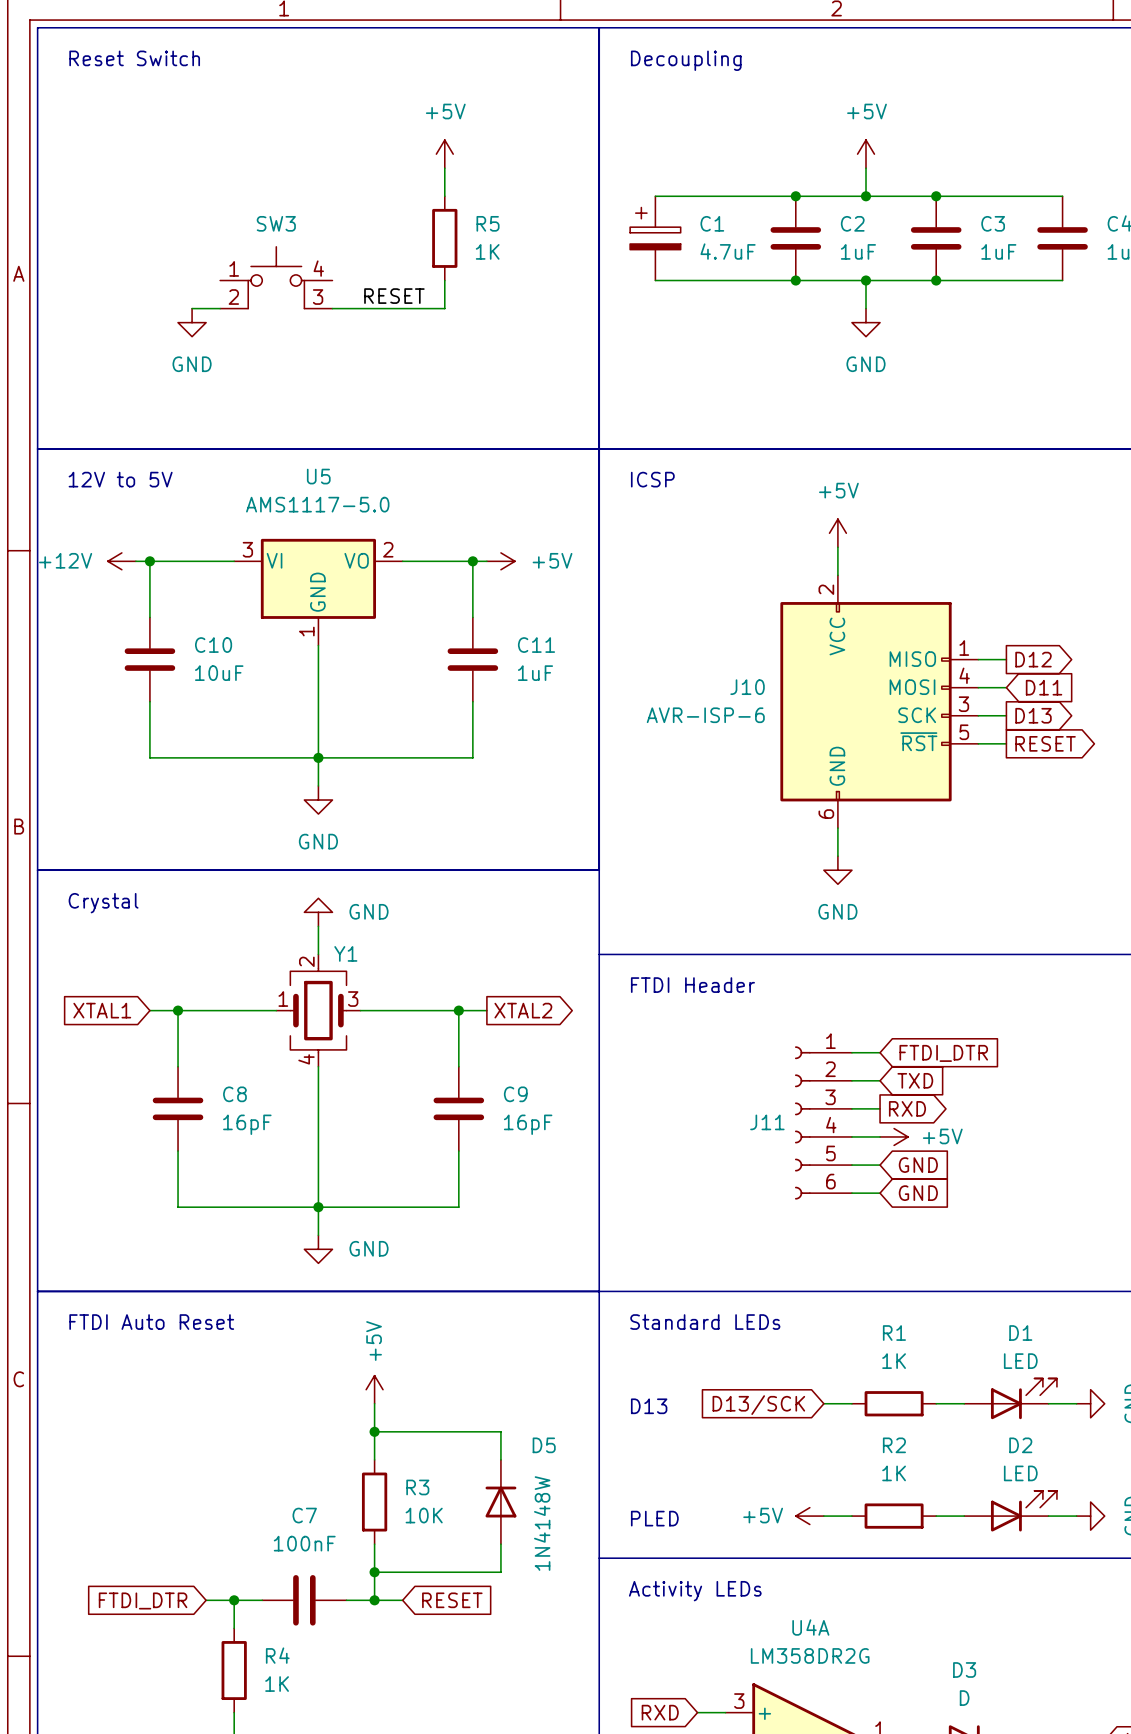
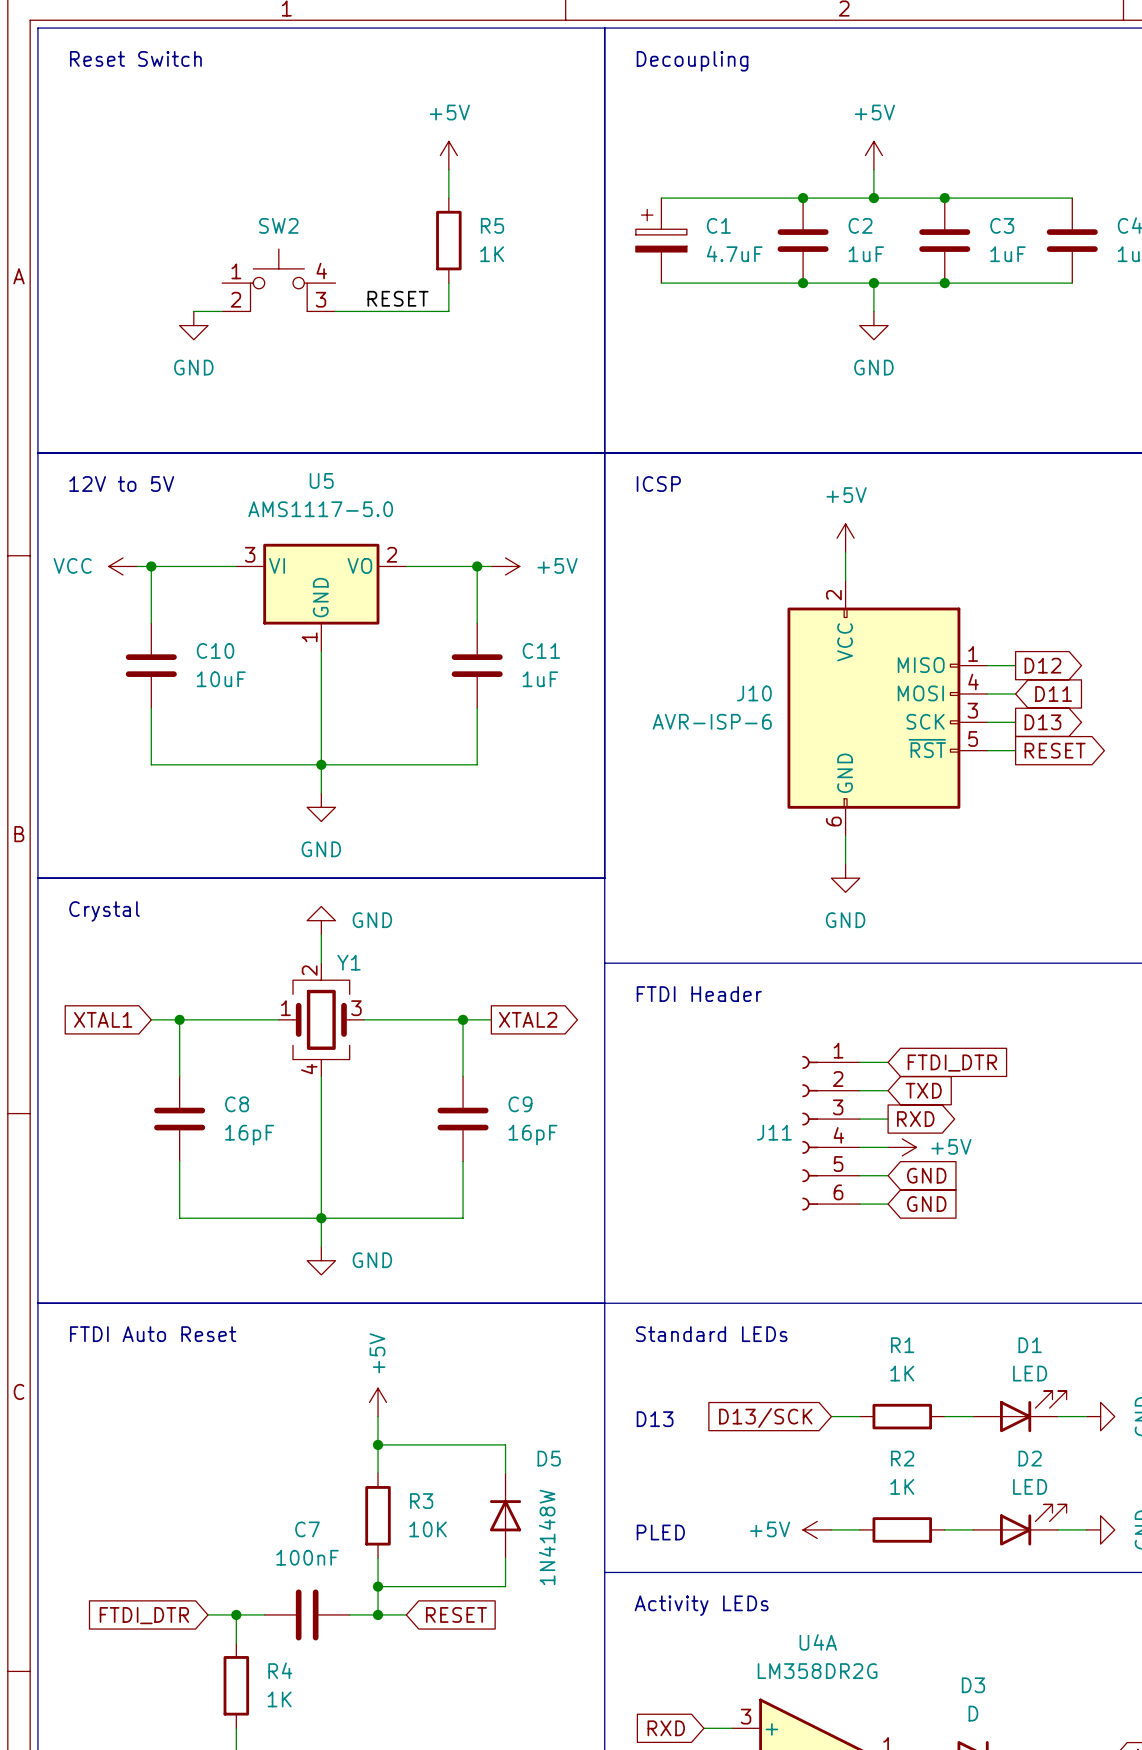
SW3 name: SW3 (276, 223) -> SW2 (278, 225)
power symbol: +12V (121, 561) -> VCC (122, 566)

